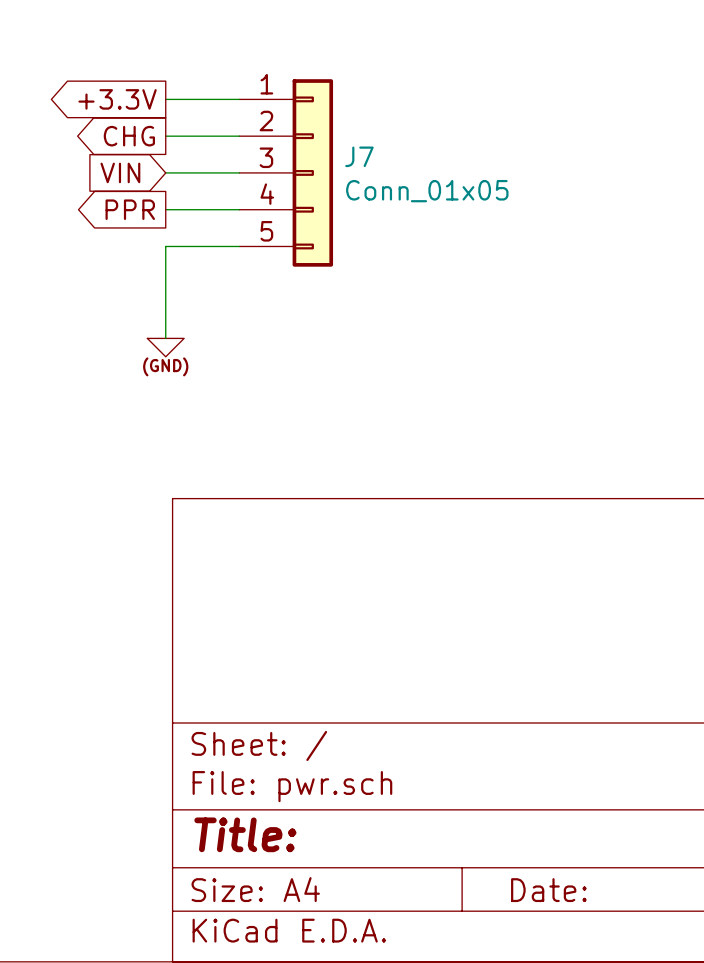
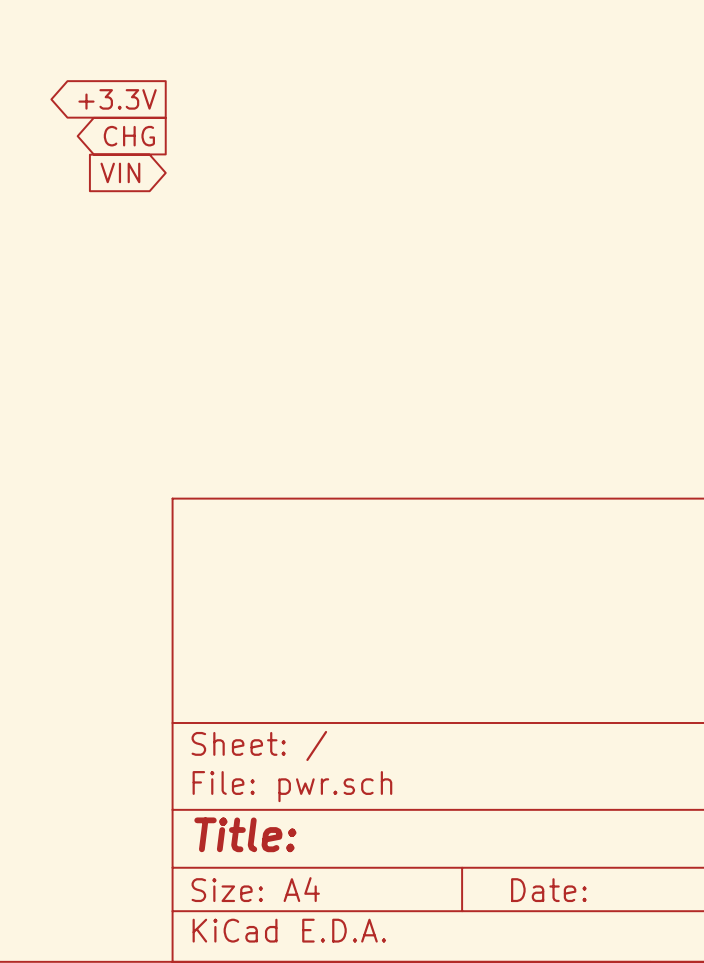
wire: (165, 99) (239, 99) -> none
wire: (165, 136) (239, 136) -> none
wire: (165, 172) (239, 172) -> none
J7: Conn_01x05 (286, 172) -> none
global label: PPR (130, 209) -> none
wire: (165, 209) (239, 209) -> none
wire: (239, 246) (165, 246) (165, 338) -> none
power symbol: (165, 347) -> none

